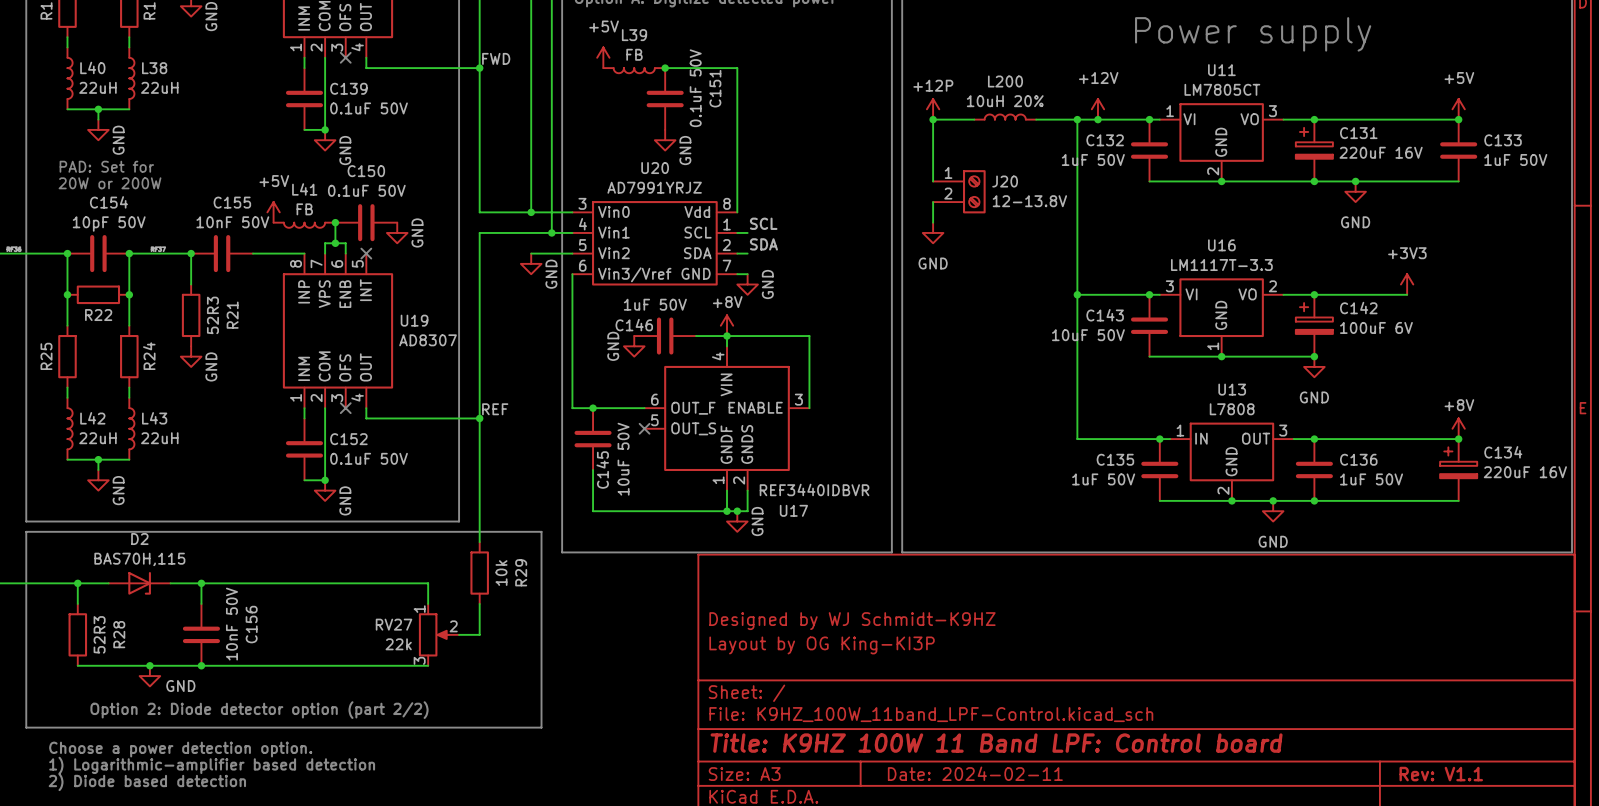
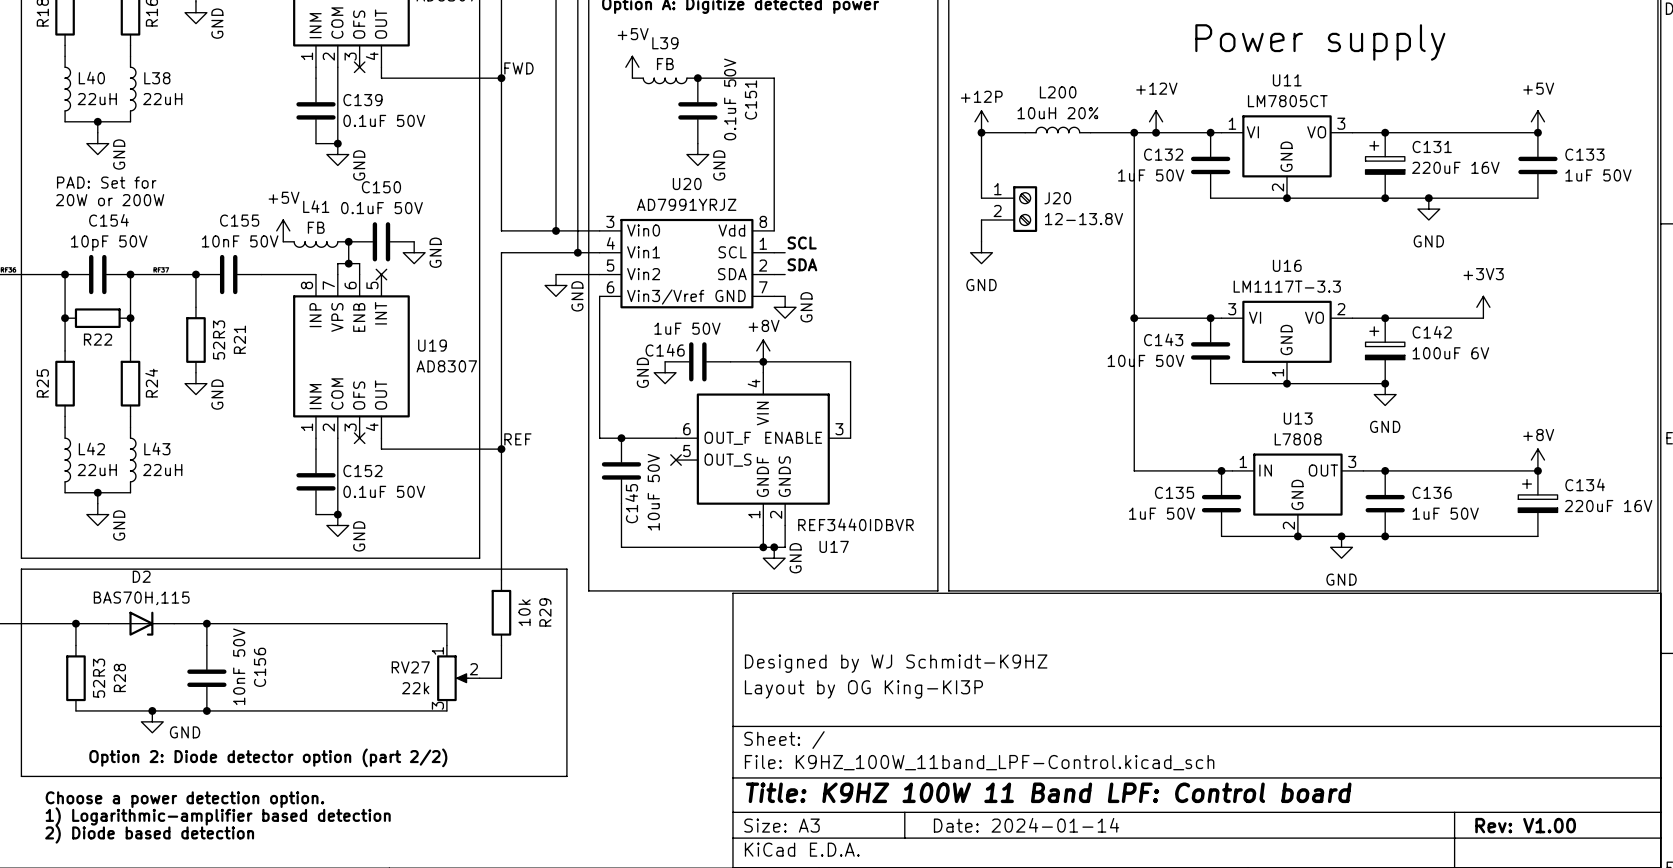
title block: Date: 2024-02-11 (975, 773) -> Date: 2024-01-14 (1026, 825)
title block: Rev: V1.1 (1441, 774) -> Rev: V1.00 (1525, 825)

